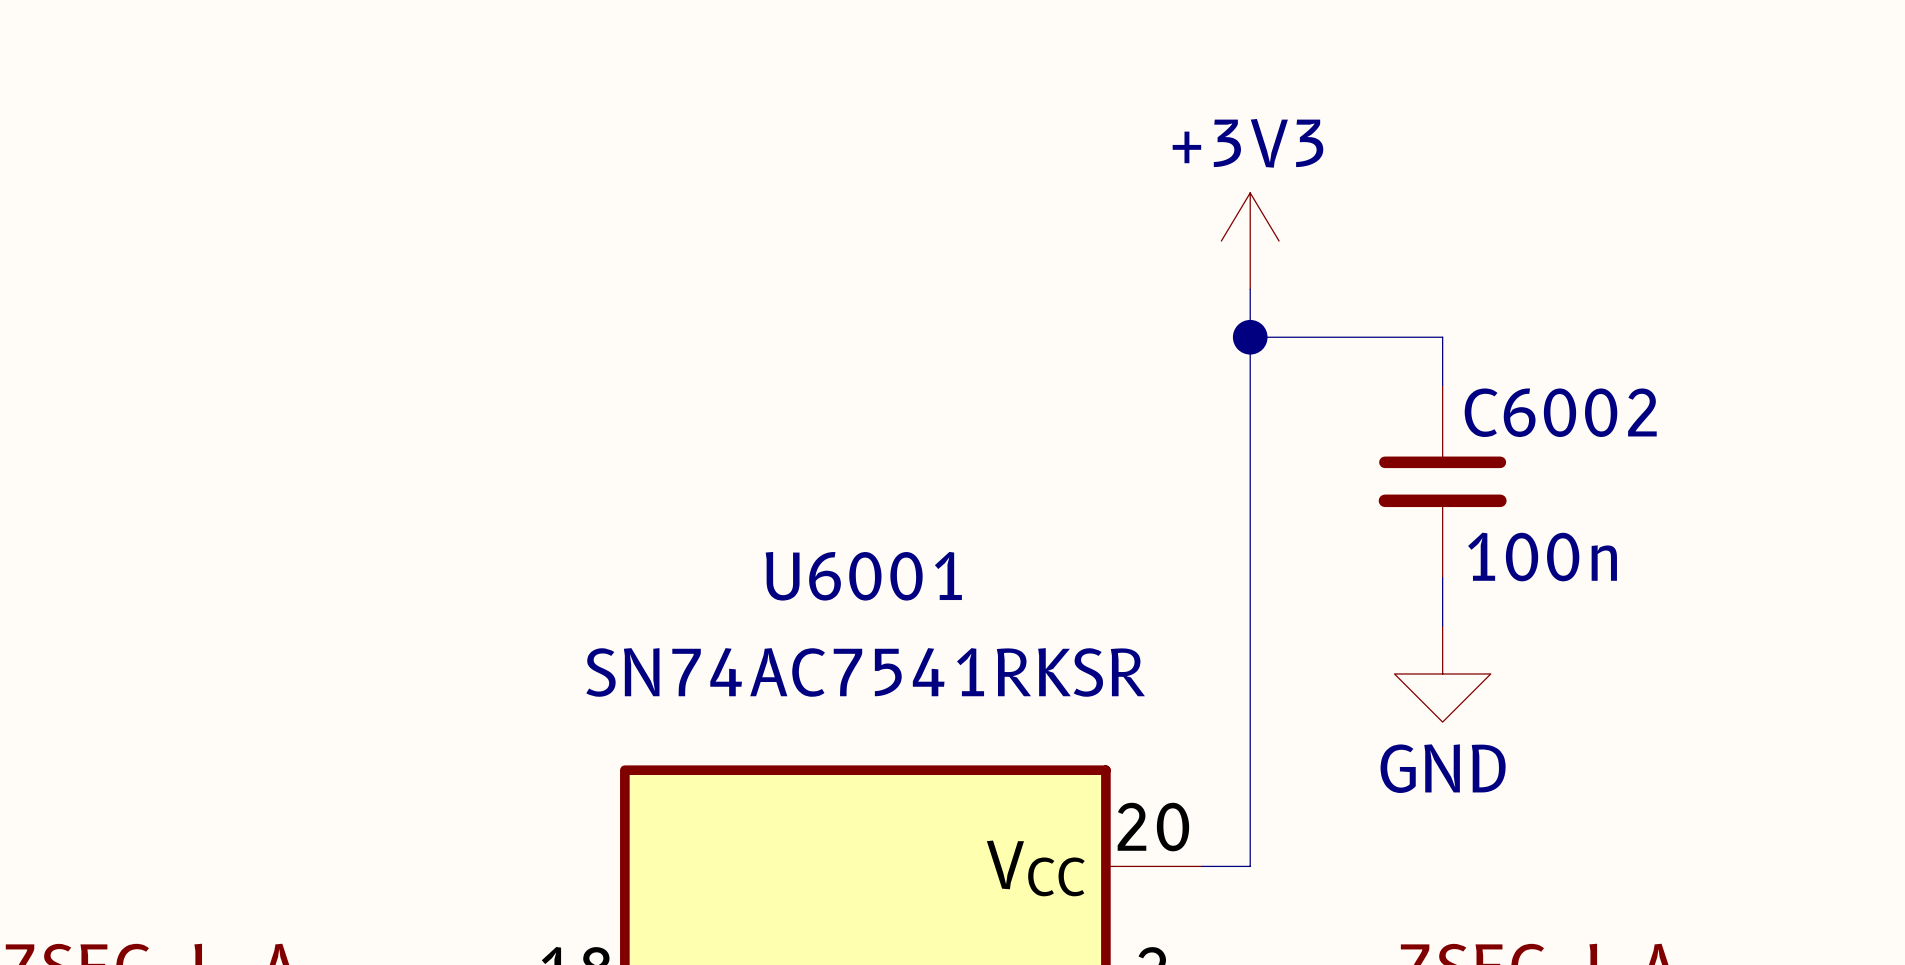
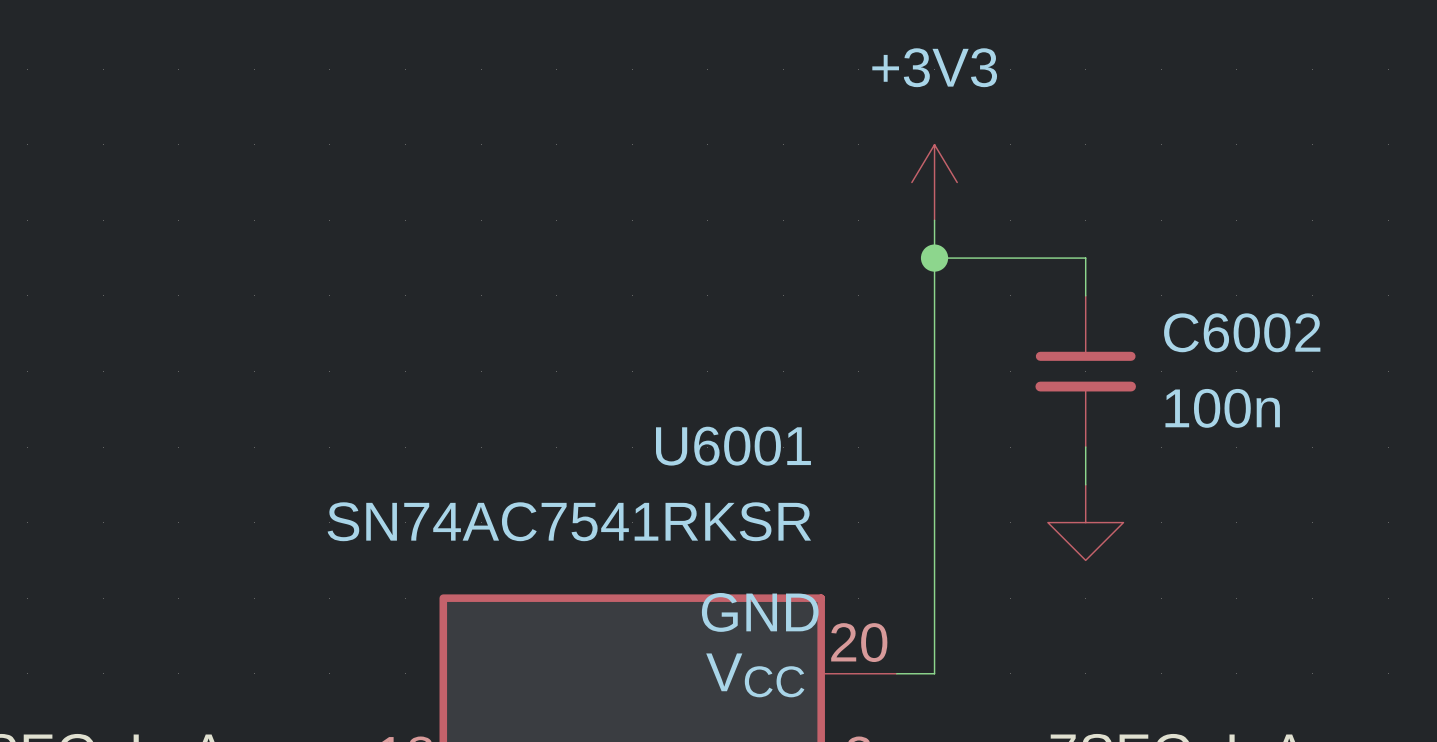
power symbol text position: +3V3 (1247, 143) -> +3V3 (934, 67)
C6002 name position: C6002 (1560, 412) -> C6002 (1242, 332)
C6002 text position: 100n (1542, 557) -> 100n (1222, 408)
U6001 name position: U6001 (863, 576) -> U6001 (733, 446)
U6001 text position: SN74AC7541RKSR (865, 672) -> SN74AC7541RKSR (569, 521)
power symbol text position: GND (1443, 768) -> GND (760, 612)

